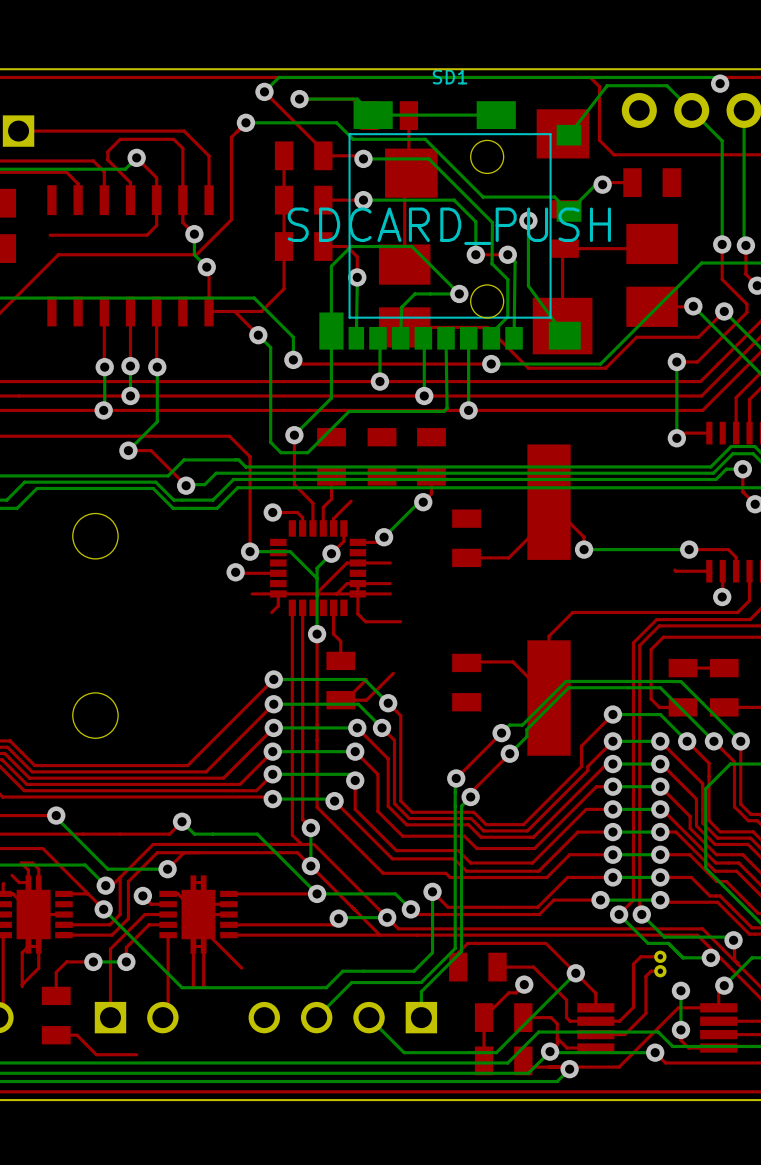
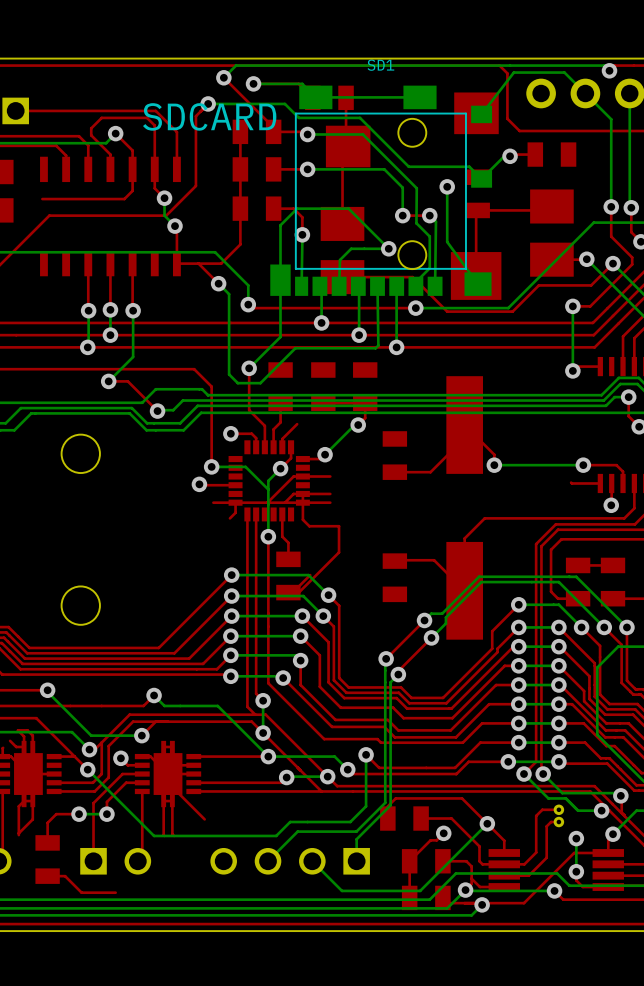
SD1 value: SDCARD_PUSH (449, 226) -> SDCARD (209, 116)
top track: (393, 673) (366, 700) (353, 700) -> (339, 526) (339, 552) (298, 592)

